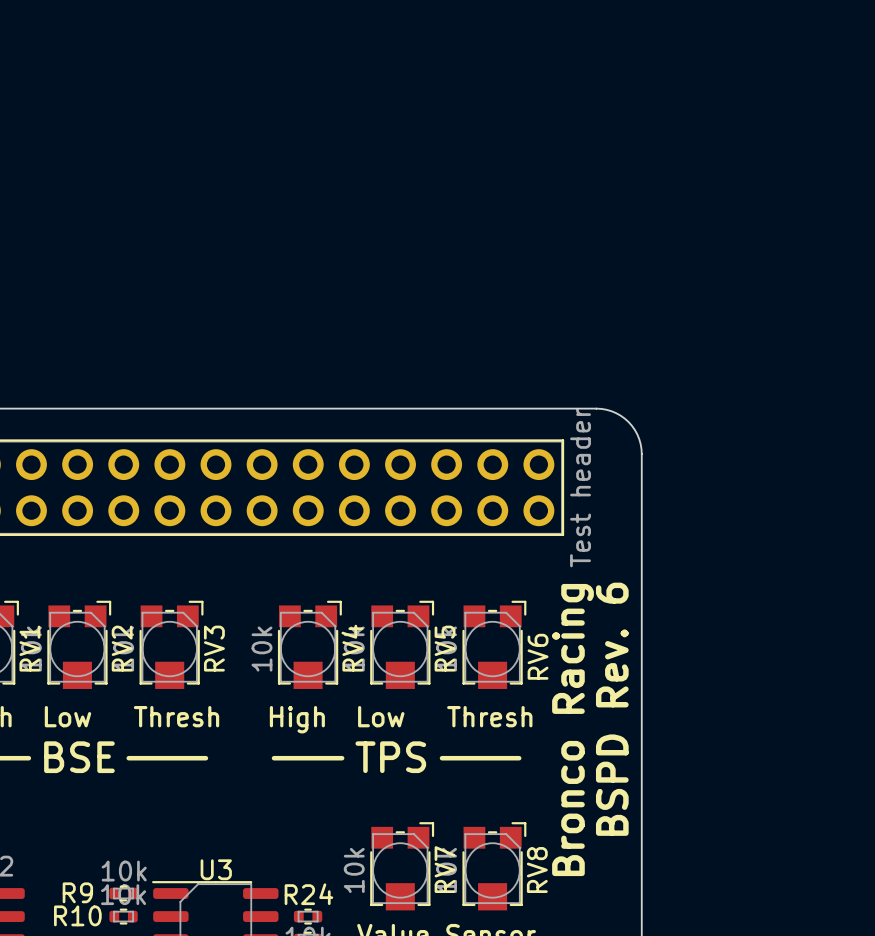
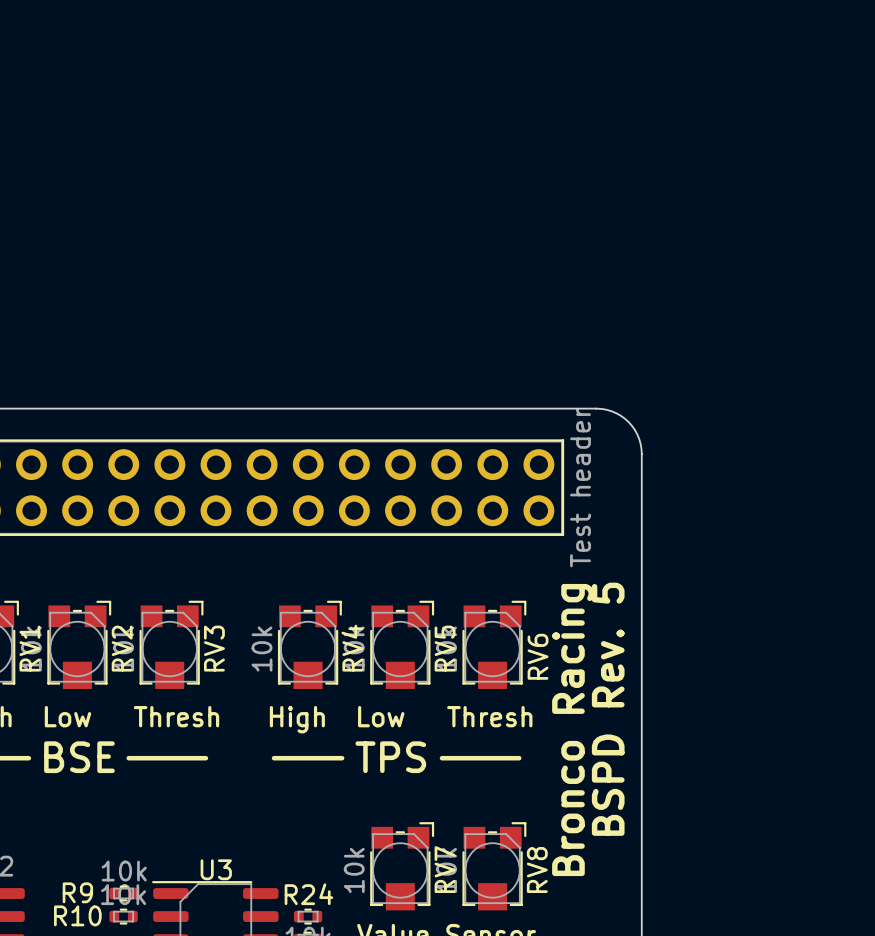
text: BSPD Rev. 6 (612, 709) -> BSPD Rev. 5 (608, 709)

